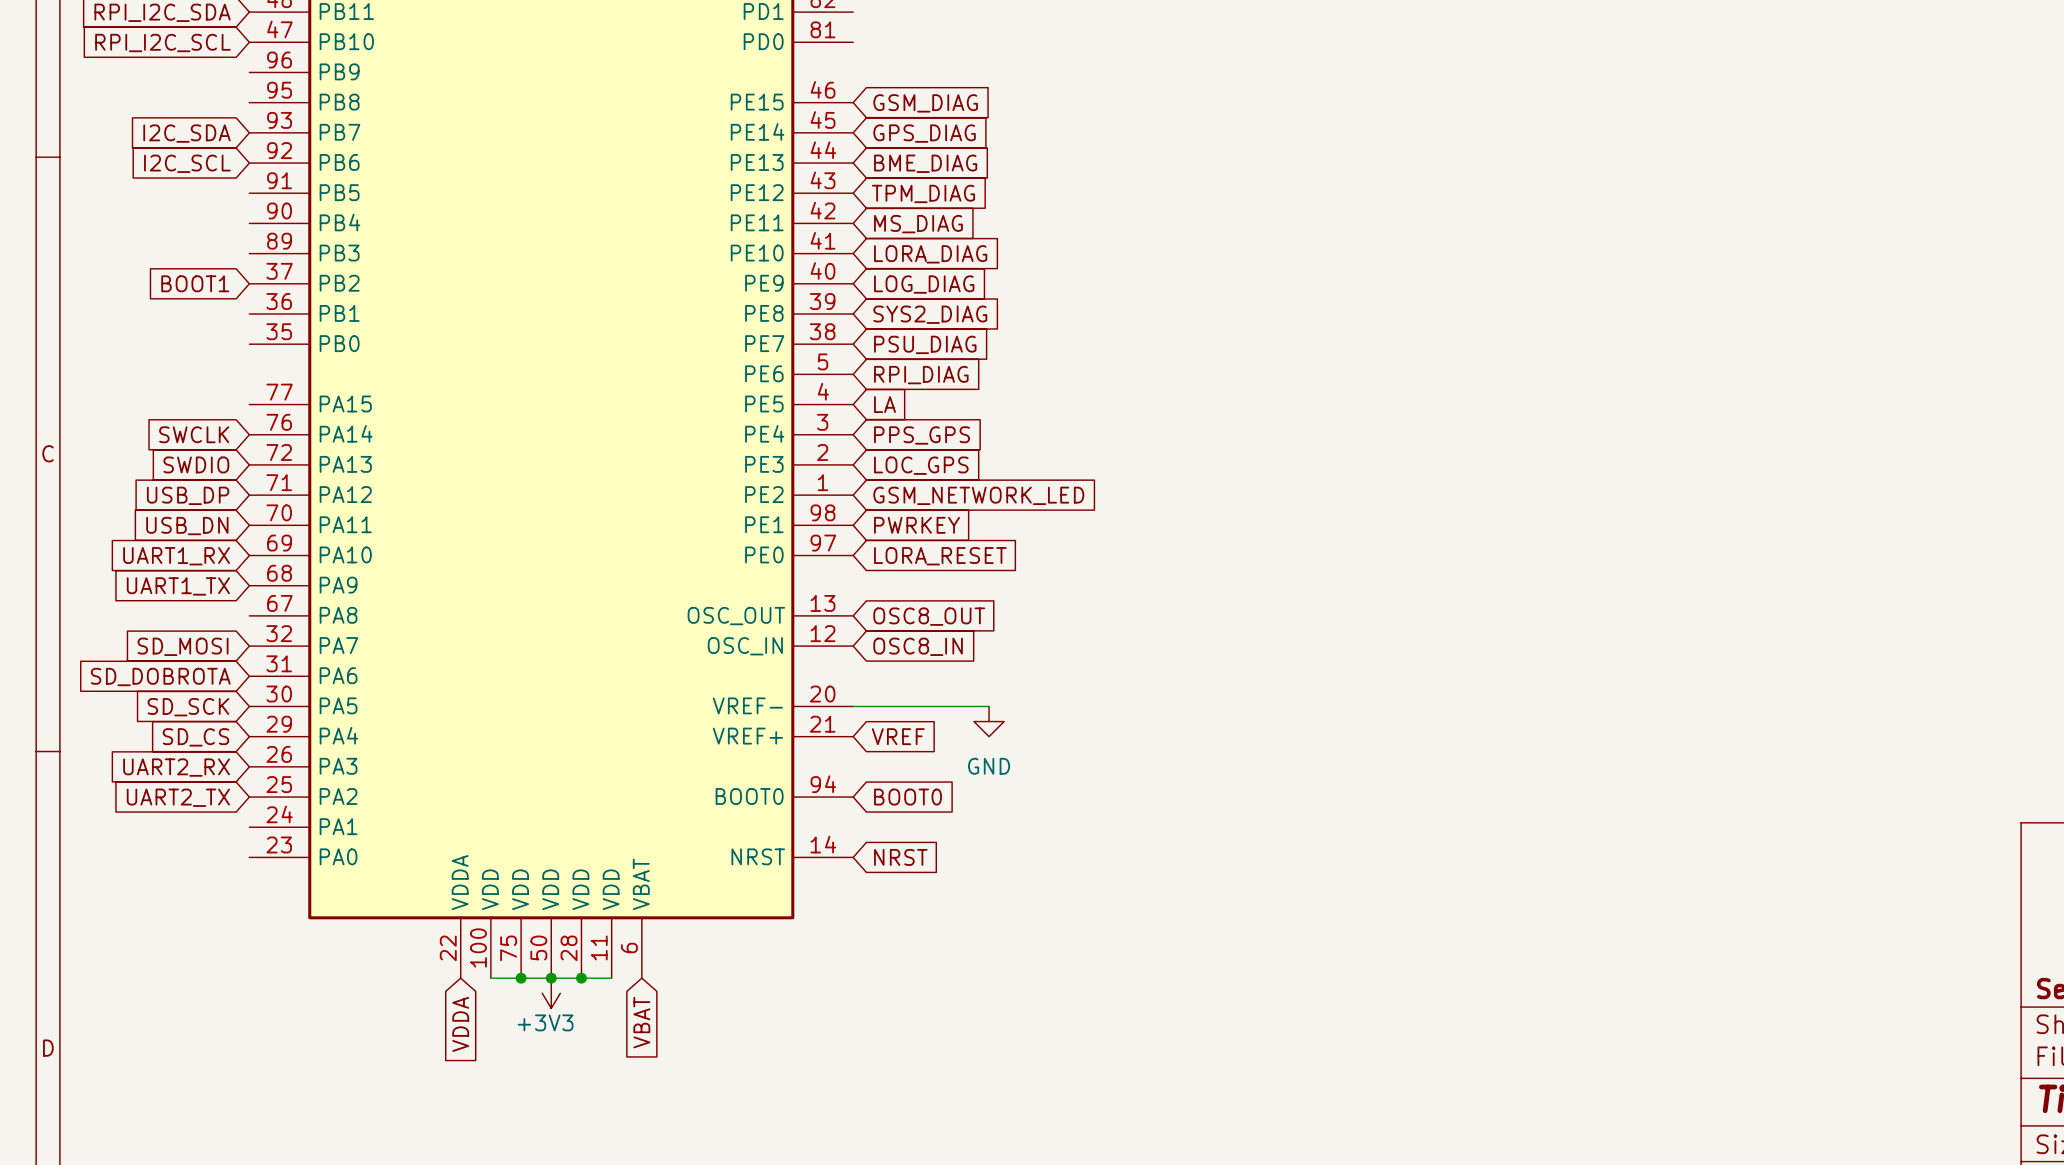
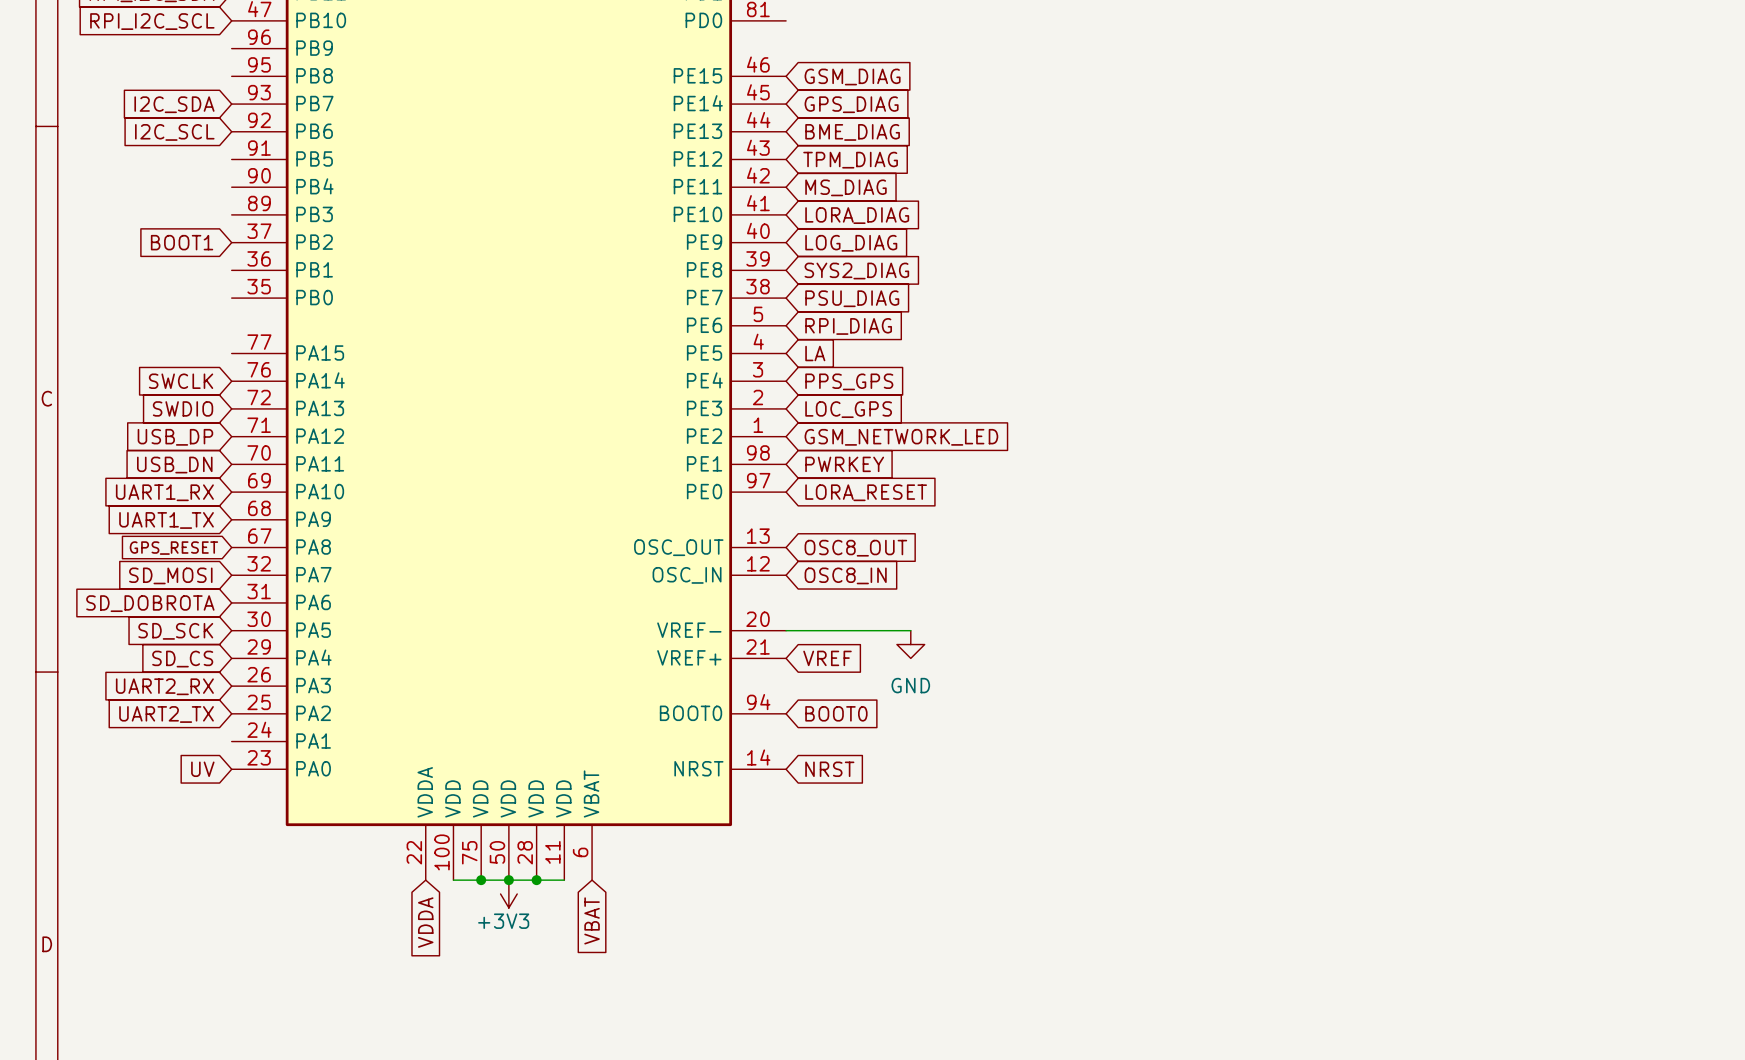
global label: none -> GPS_RESET (173, 548)
global label: none -> UV (202, 769)

